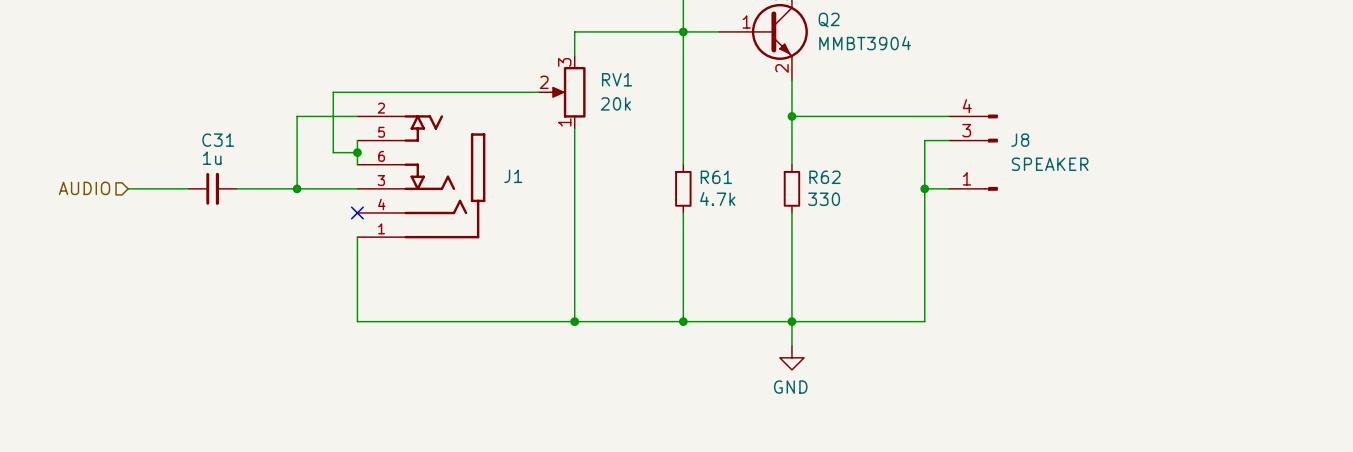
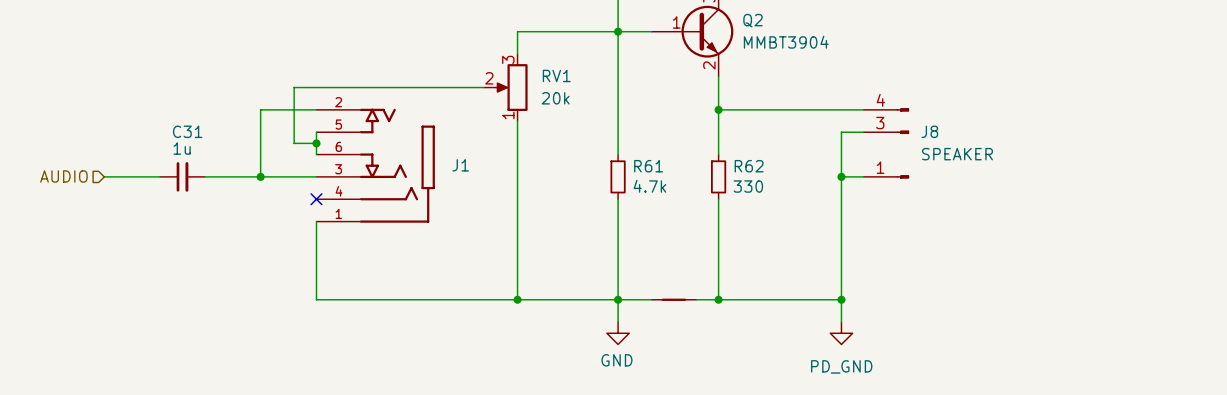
part: none -> (673, 299)
wire: (791, 321) (791, 345) -> (618, 299) (618, 322)
wire: none -> (841, 299) (841, 322)
junction: none -> (841, 299)
power symbol position: GND (791, 357) -> GND (618, 333)
power symbol: none -> PD_GND (841, 333)

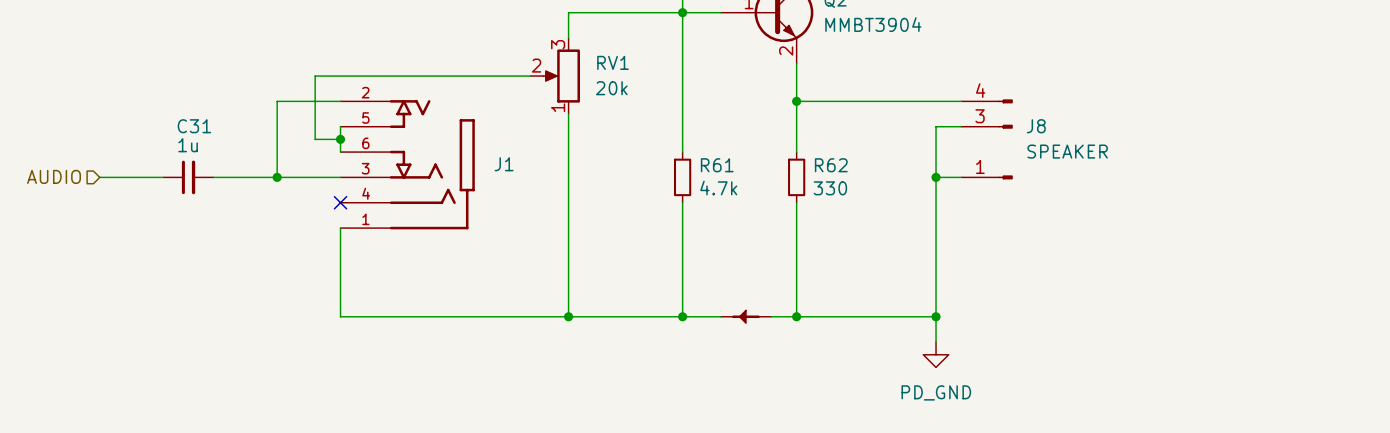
part symbol: [651, 298, 697, 301] -> [720, 310, 772, 324]
wire: (618, 299) (618, 322) -> none
power symbol: GND (618, 333) -> none

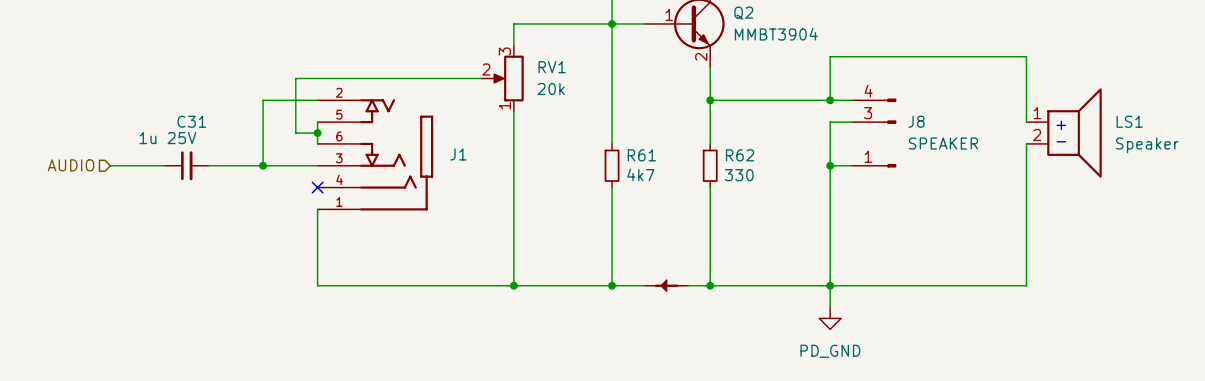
wire: none -> (830, 100) (830, 56) (1026, 56) (1026, 122)
junction: none -> (830, 100)
text: none -> + (1061, 125)
LS1: none -> Speaker (1064, 133)
C31 value: 1u (188, 145) -> 1u 25V (167, 138)
text: none -> - (1061, 141)
wire: none -> (1026, 143) (1026, 285) (830, 285)
R61 value: 4.7k (718, 188) -> 4k7 (640, 174)

